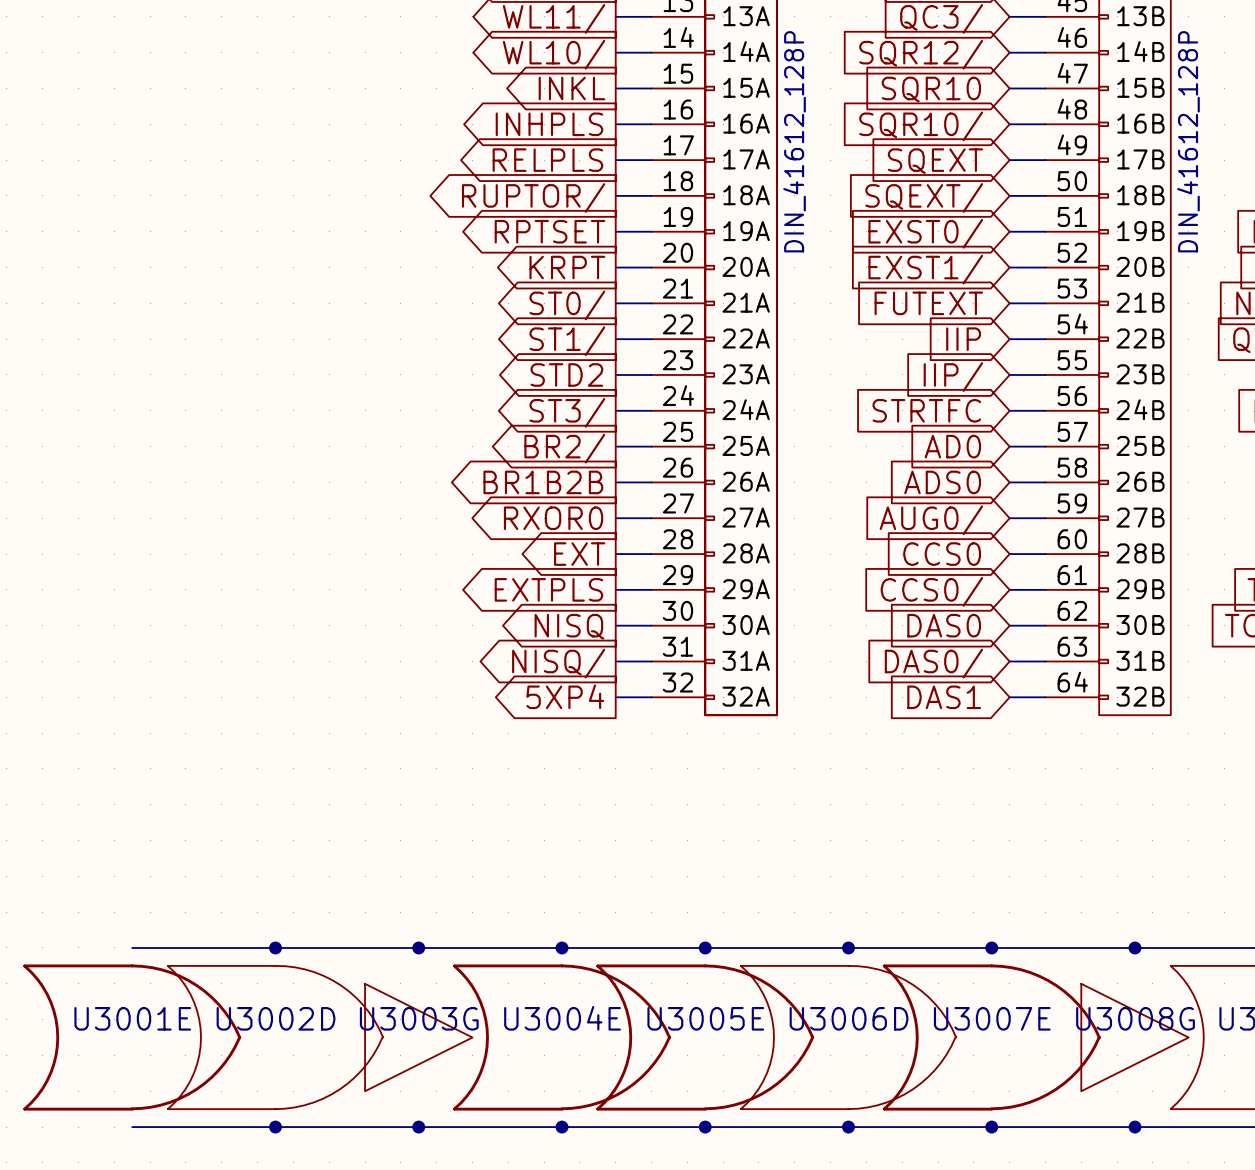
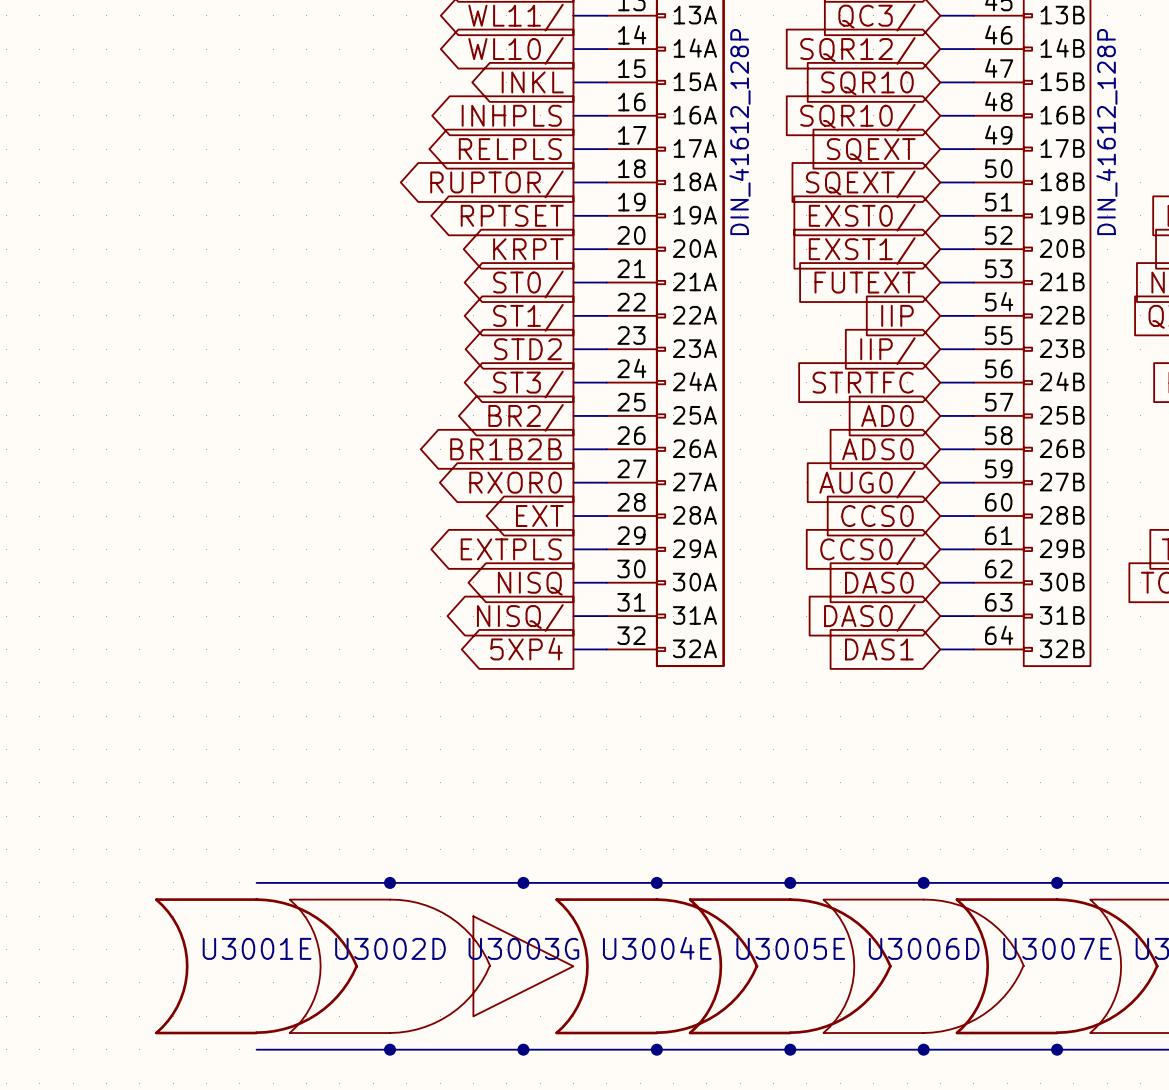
wire: (132, 947) (275, 947) -> none
junction: (275, 947) -> none
U3005E name: U3005E (705, 1018) -> U3004E (657, 948)
U3001E position: (132, 1037) -> (256, 966)
U3002D position: (275, 1037) -> (390, 966)
U3003G position: (418, 1037) -> (523, 966)
U3004E: (562, 1037) -> none
U3006D position: (848, 1037) -> (923, 966)
U3005E: none -> (790, 966)
U3007E position: (991, 1037) -> (1057, 966)
U3008G: (1135, 1037) -> none
wire: (132, 1127) (275, 1127) -> none
junction: (275, 1127) -> none

